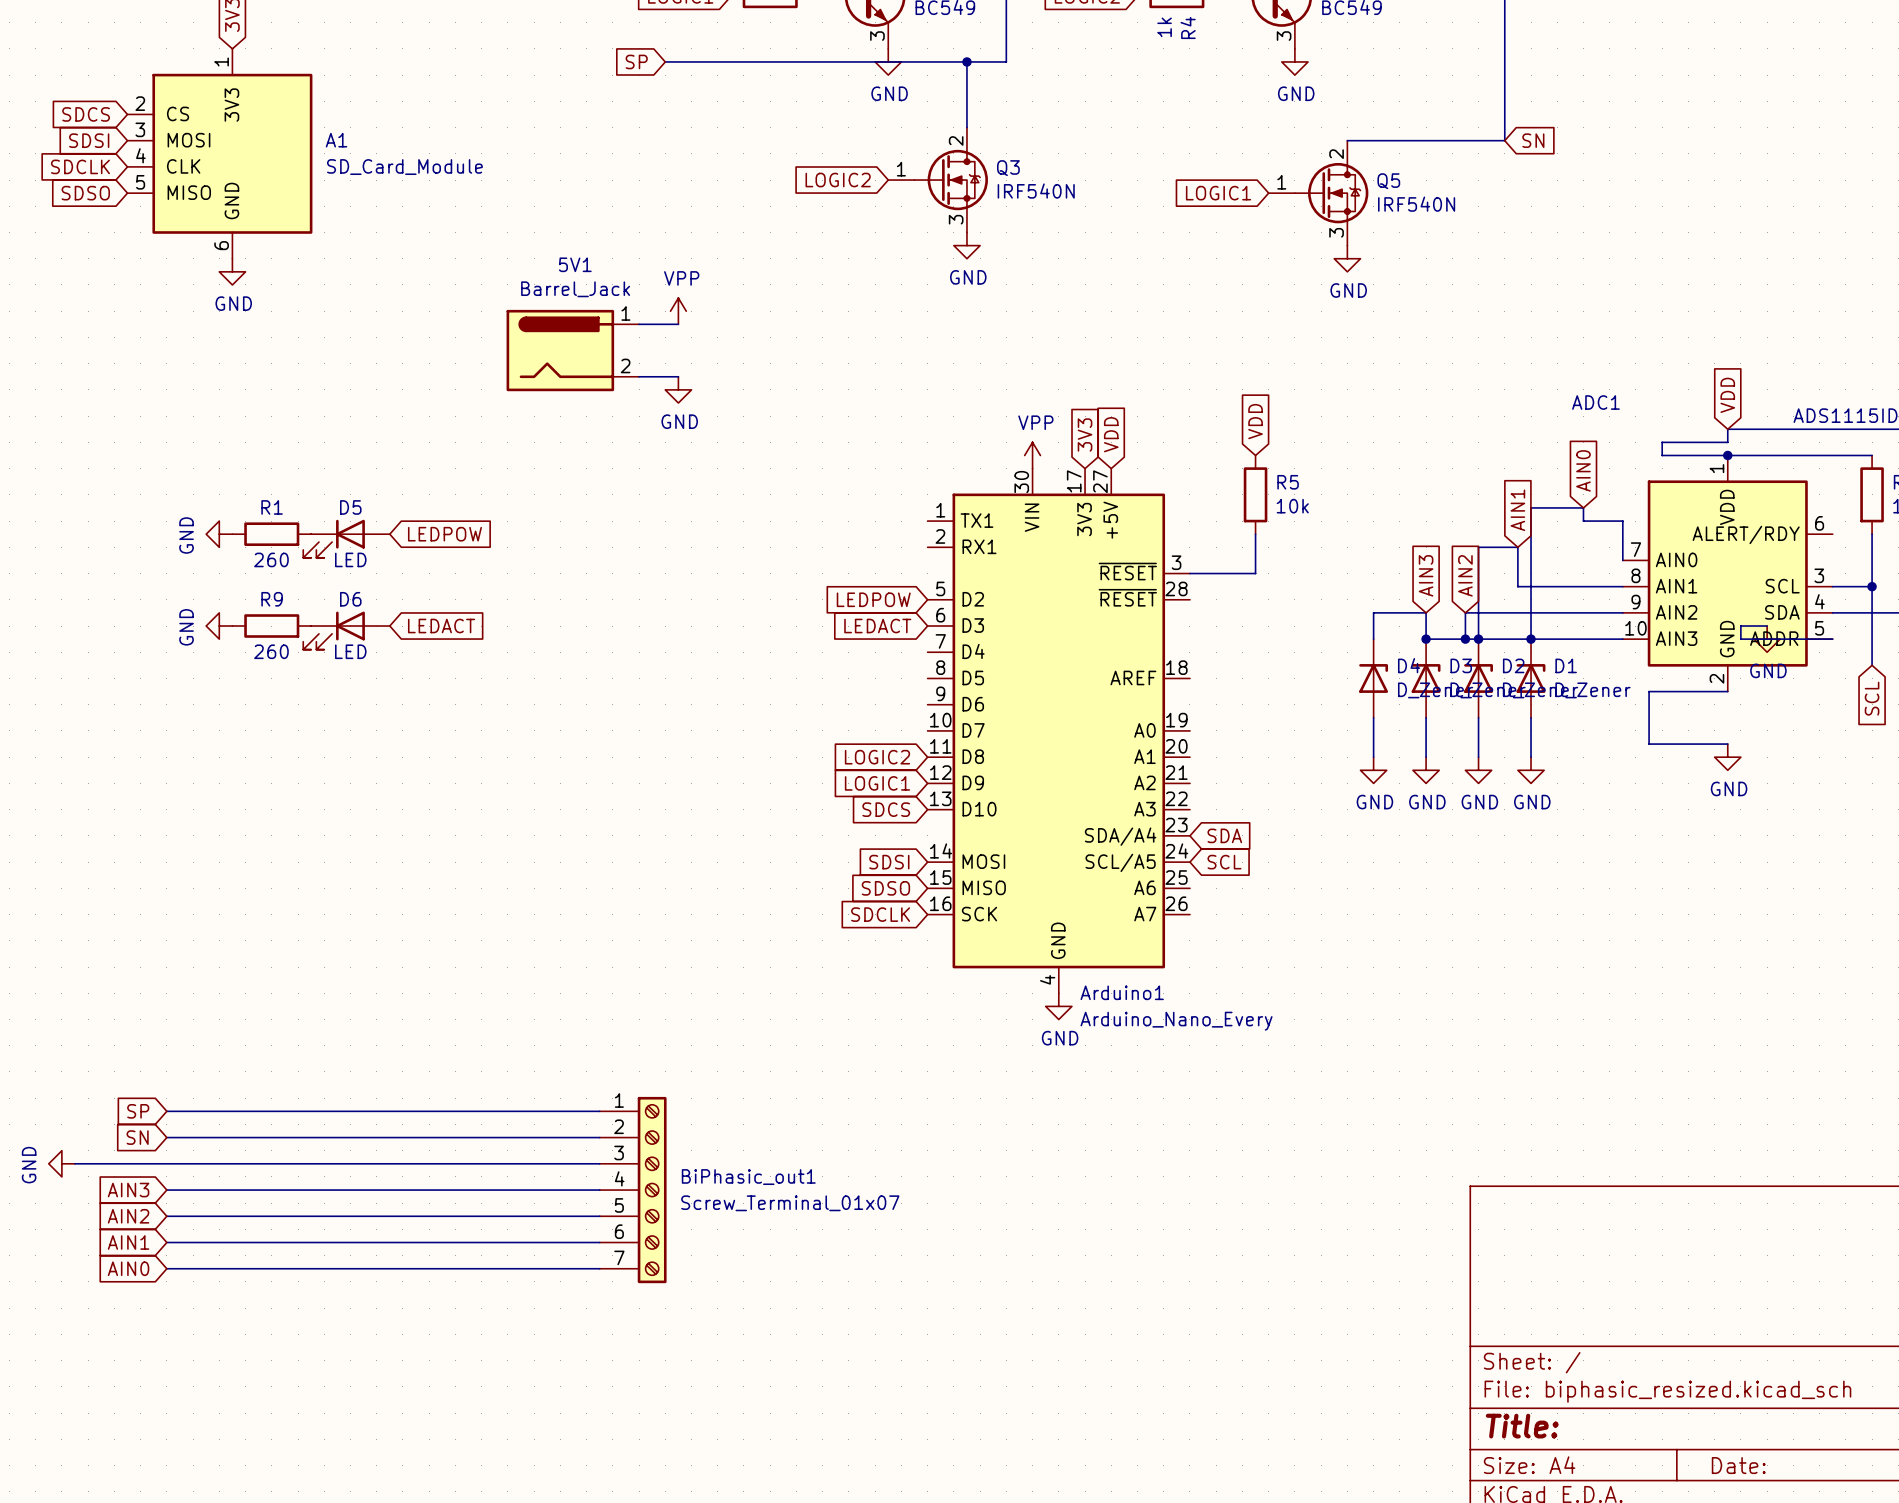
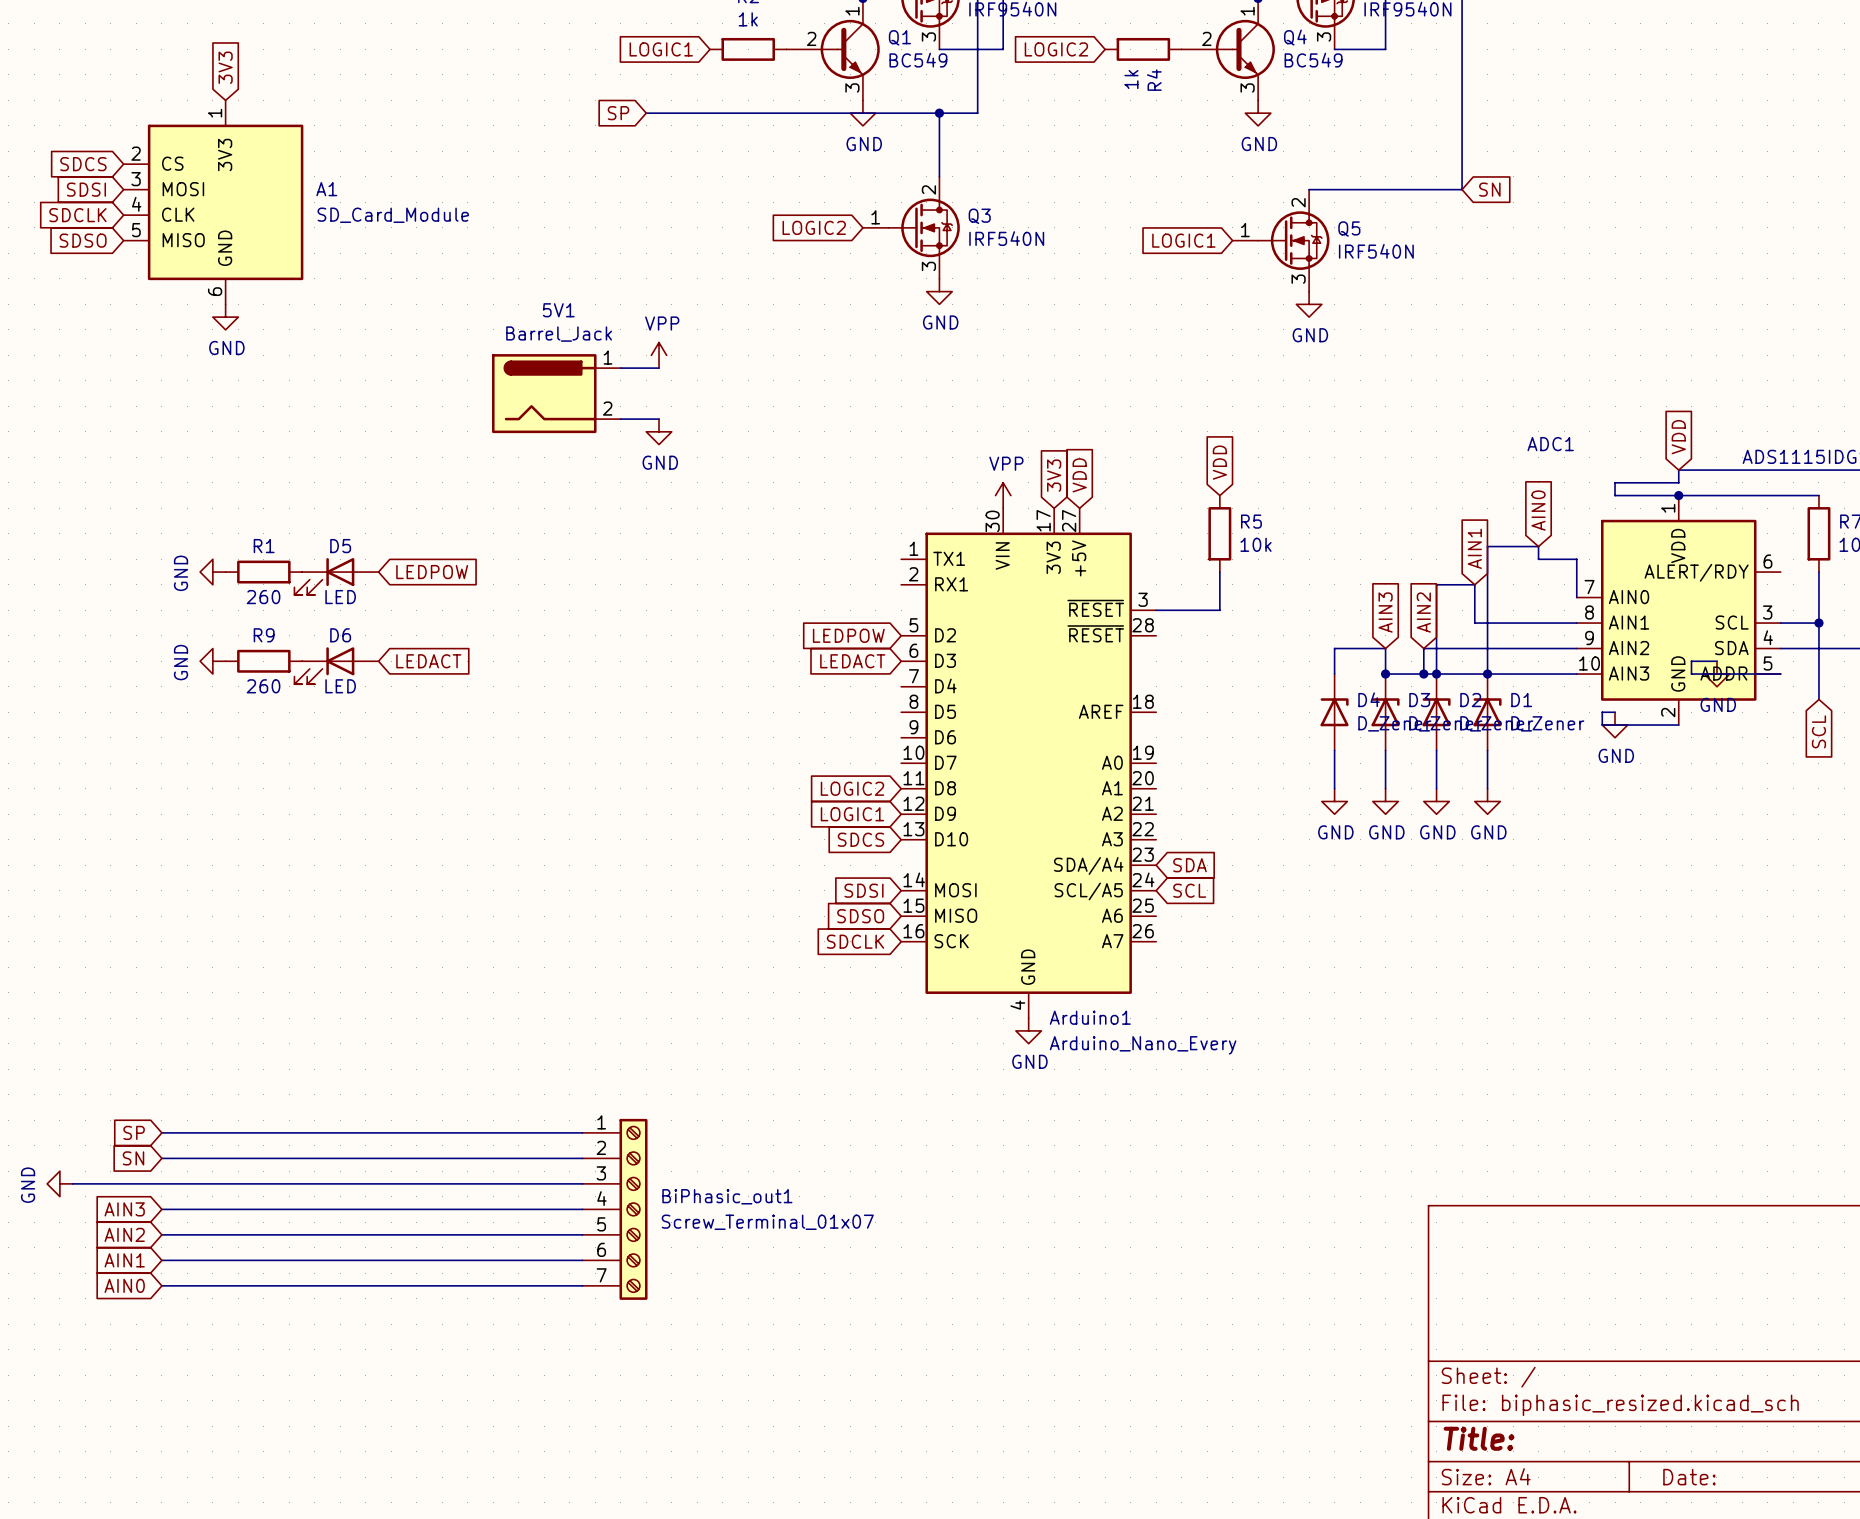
wire: (1649, 691) (1649, 744) (1727, 744) -> (1602, 725) (1602, 712) (1615, 712)
power symbol position: GND (1727, 757) -> GND (1615, 725)

